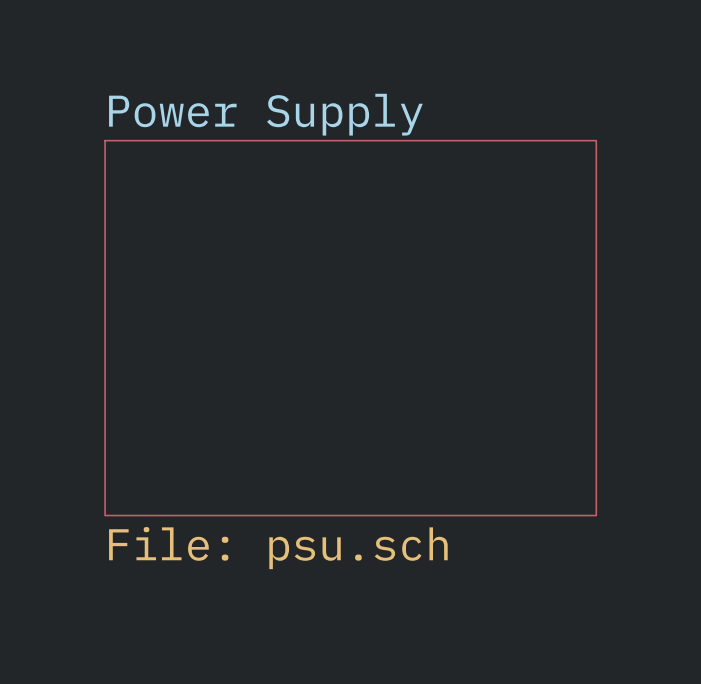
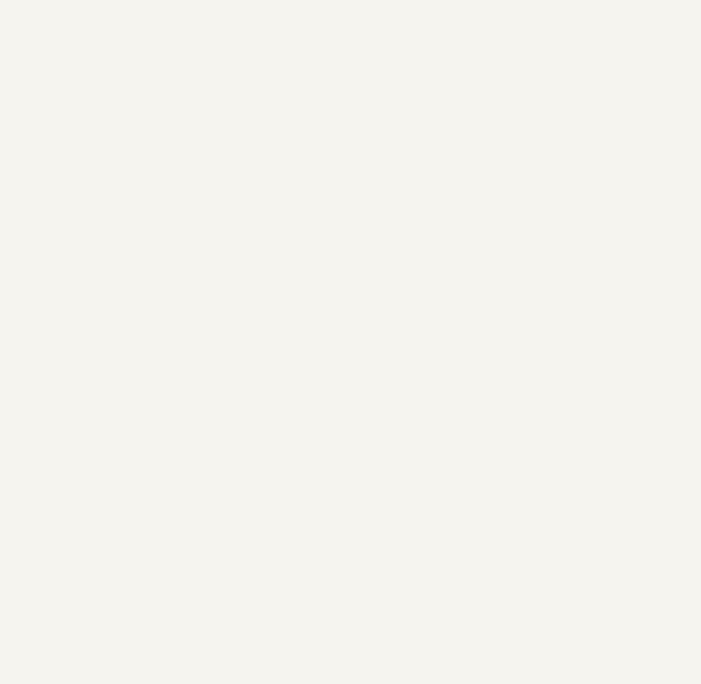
sheet Power Supply: File: psu.sch (350, 328) -> none

